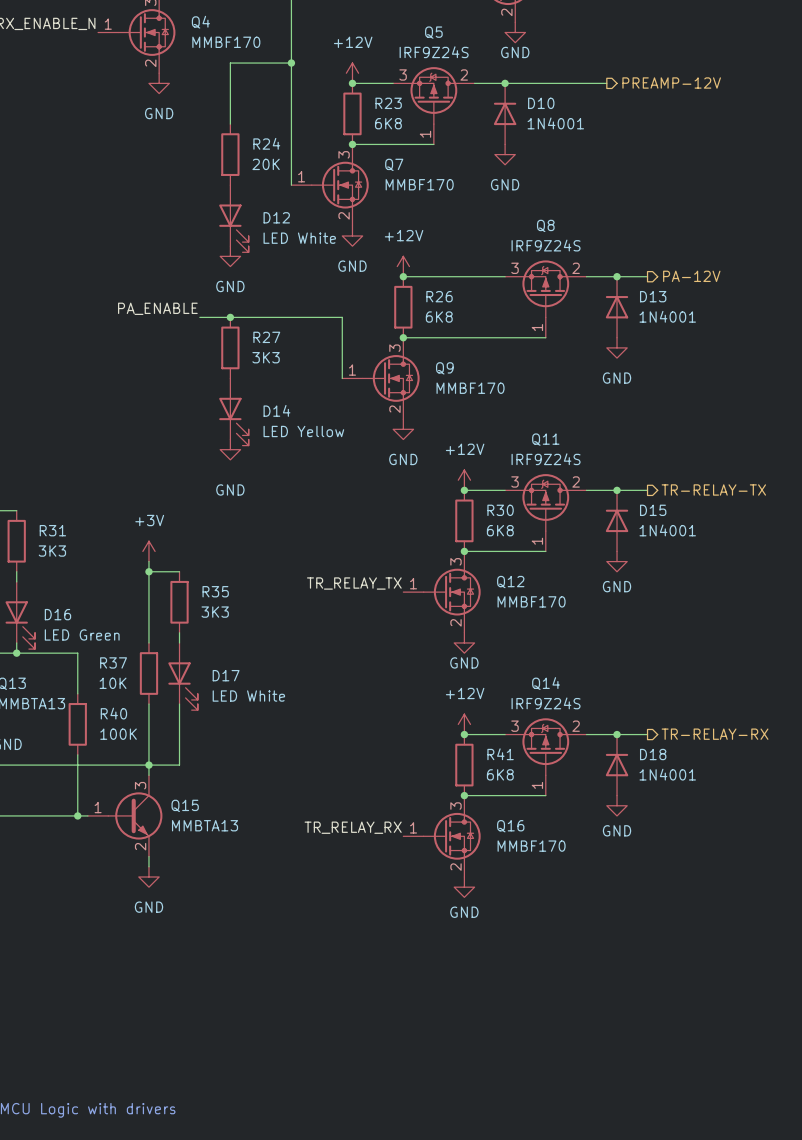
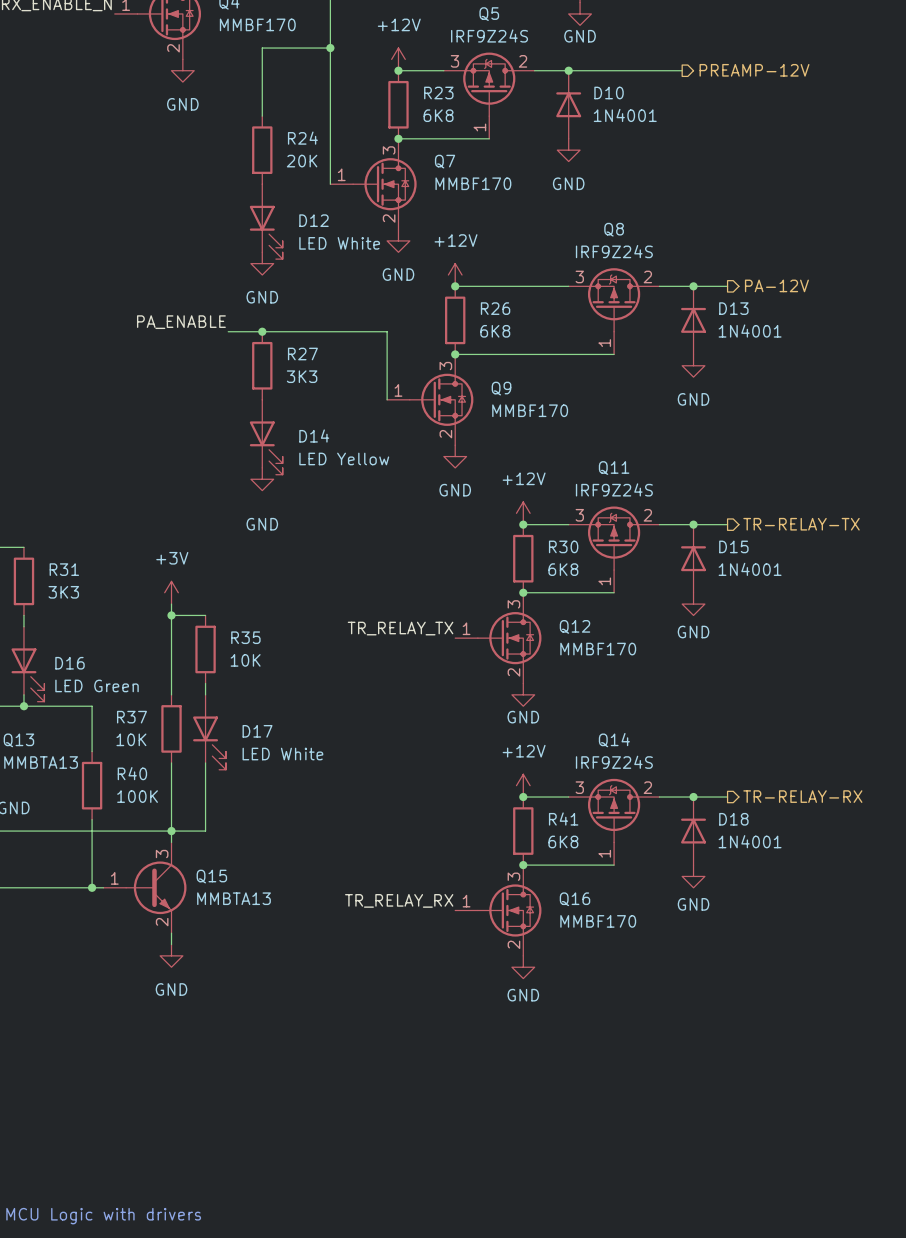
R35 value: 3K3 (215, 612) -> 10K (245, 660)

